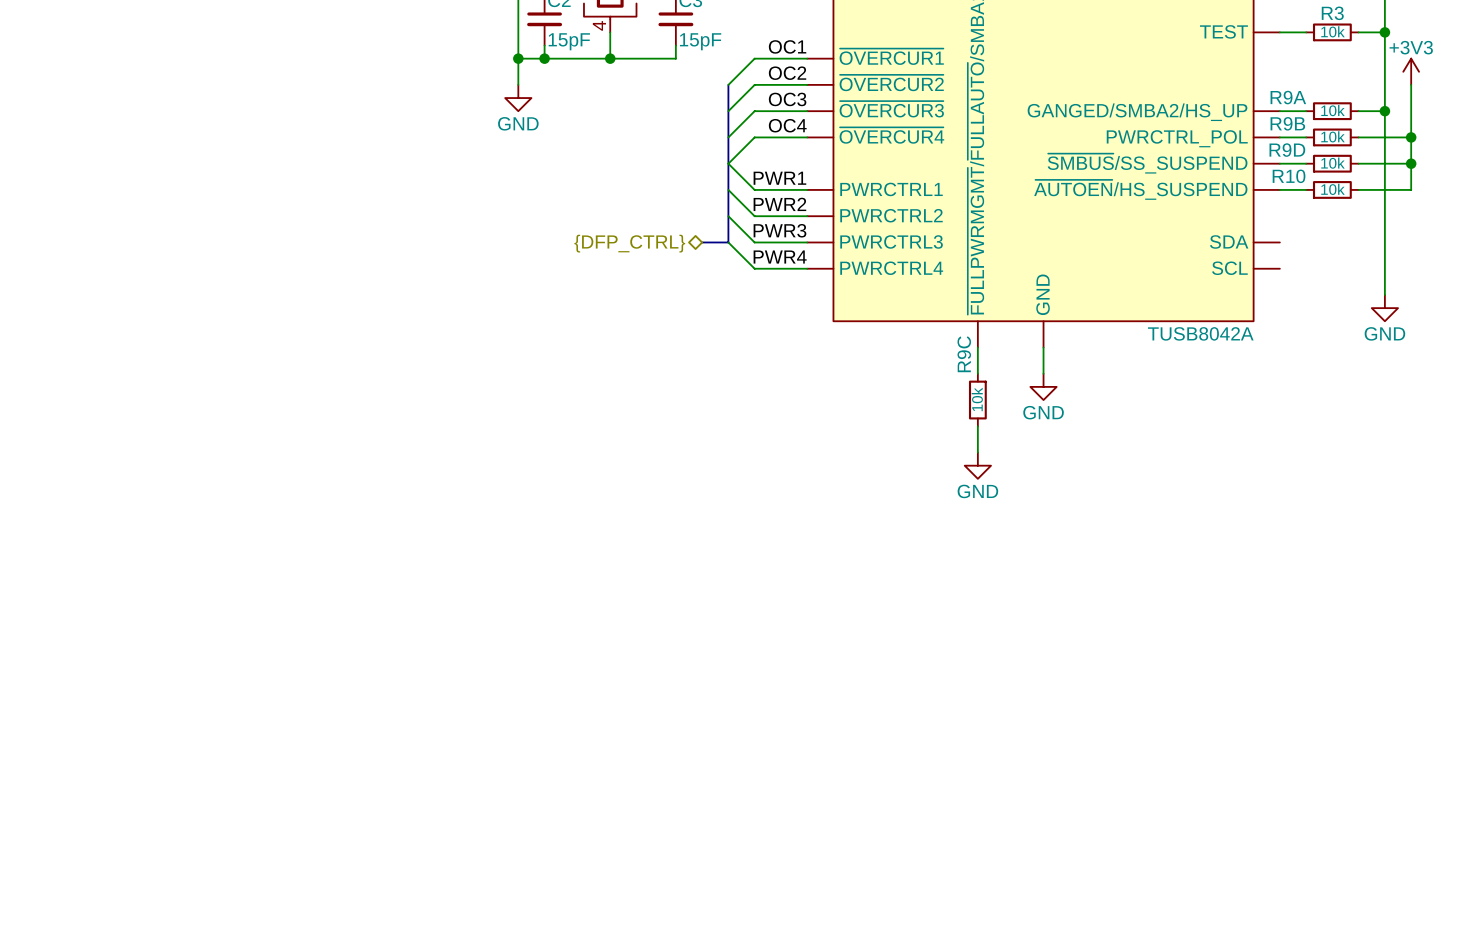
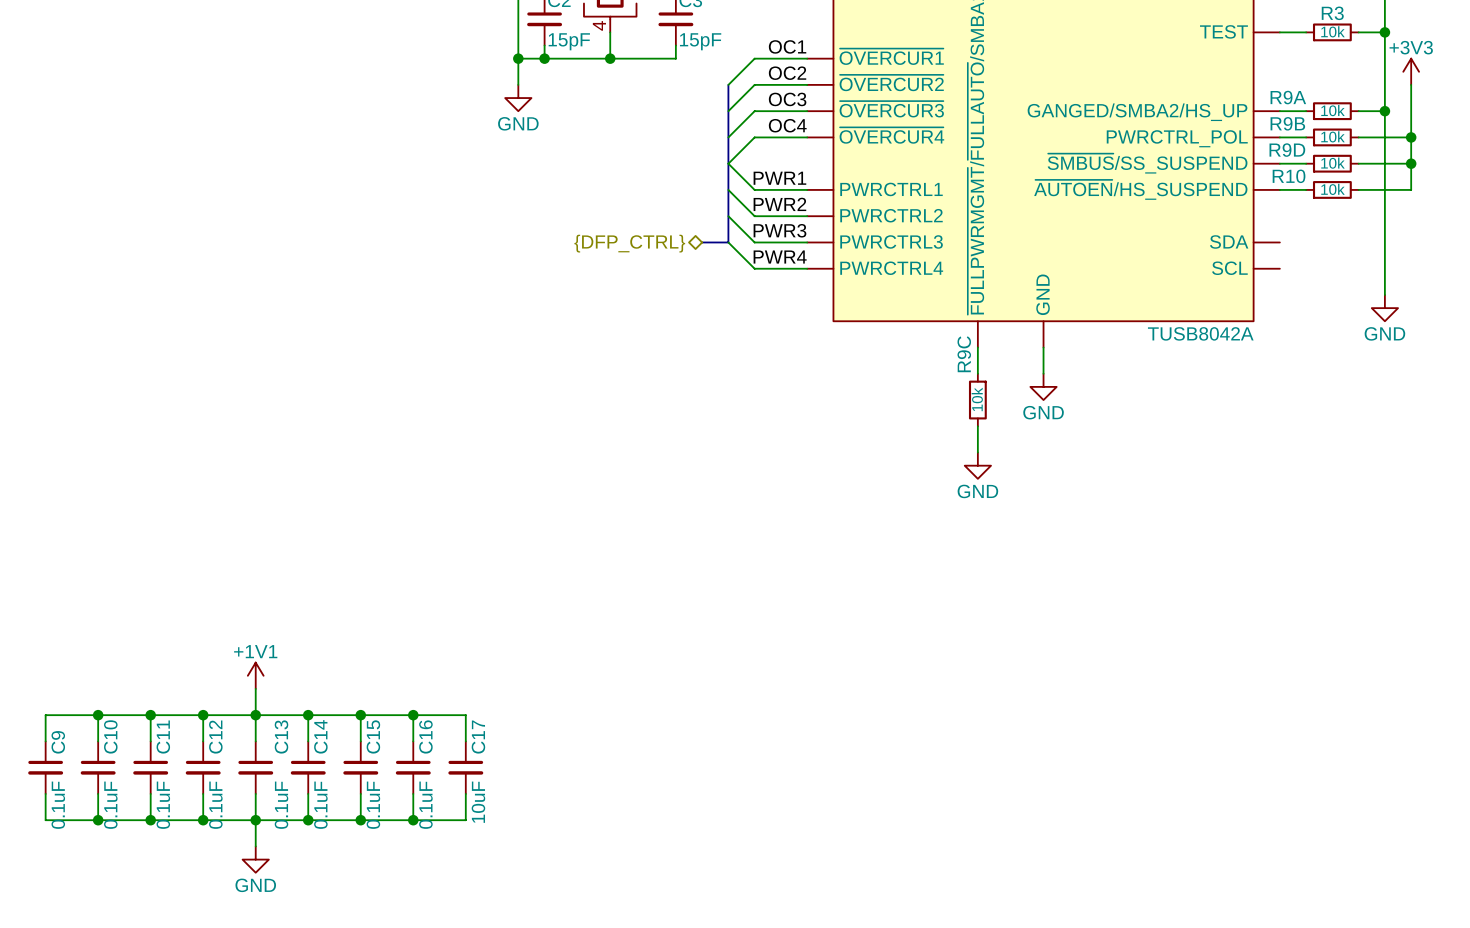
power symbol: none -> +1V1 (255, 675)
wire: none -> (255, 688) (255, 741)
wire: none -> (98, 715) (98, 741)
junction: none -> (98, 715)
wire: none -> (150, 715) (150, 741)
junction: none -> (150, 715)
wire: none -> (203, 715) (203, 741)
junction: none -> (203, 715)
junction: none -> (255, 715)
wire: none -> (308, 715) (308, 741)
junction: none -> (308, 715)
wire: none -> (360, 715) (360, 741)
junction: none -> (360, 715)
wire: none -> (413, 715) (413, 741)
junction: none -> (413, 715)
wire: none -> (45, 741) (45, 715) (465, 715) (465, 741)
C9: none -> 0.1uF (45, 767)
C10: none -> 0.1uF (98, 767)
C11: none -> 0.1uF (150, 767)
C12: none -> 0.1uF (203, 767)
C13: none -> 0.1uF (255, 767)
C14: none -> 0.1uF (308, 767)
C15: none -> 0.1uF (360, 767)
C16: none -> 0.1uF (413, 767)
C17: none -> 10uF (465, 767)
wire: none -> (45, 793) (45, 820) (465, 820) (465, 793)
wire: none -> (98, 793) (98, 820)
wire: none -> (150, 793) (150, 820)
wire: none -> (203, 793) (203, 820)
wire: none -> (255, 793) (255, 846)
wire: none -> (308, 793) (308, 820)
wire: none -> (360, 793) (360, 820)
wire: none -> (413, 793) (413, 820)
junction: none -> (98, 820)
junction: none -> (150, 820)
junction: none -> (203, 820)
junction: none -> (255, 820)
junction: none -> (308, 820)
junction: none -> (360, 820)
junction: none -> (413, 820)
power symbol: none -> GND (255, 859)

